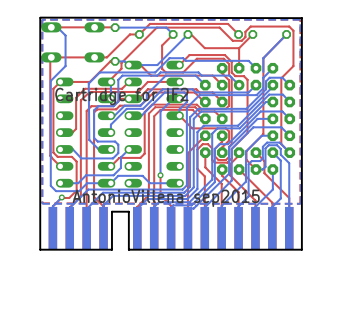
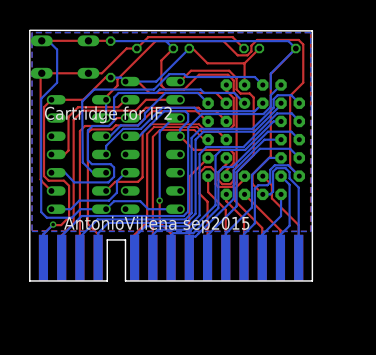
bottom track: (286, 34) (263, 58) -> (165, 41) (288, 41) (295, 48) (270, 74)

